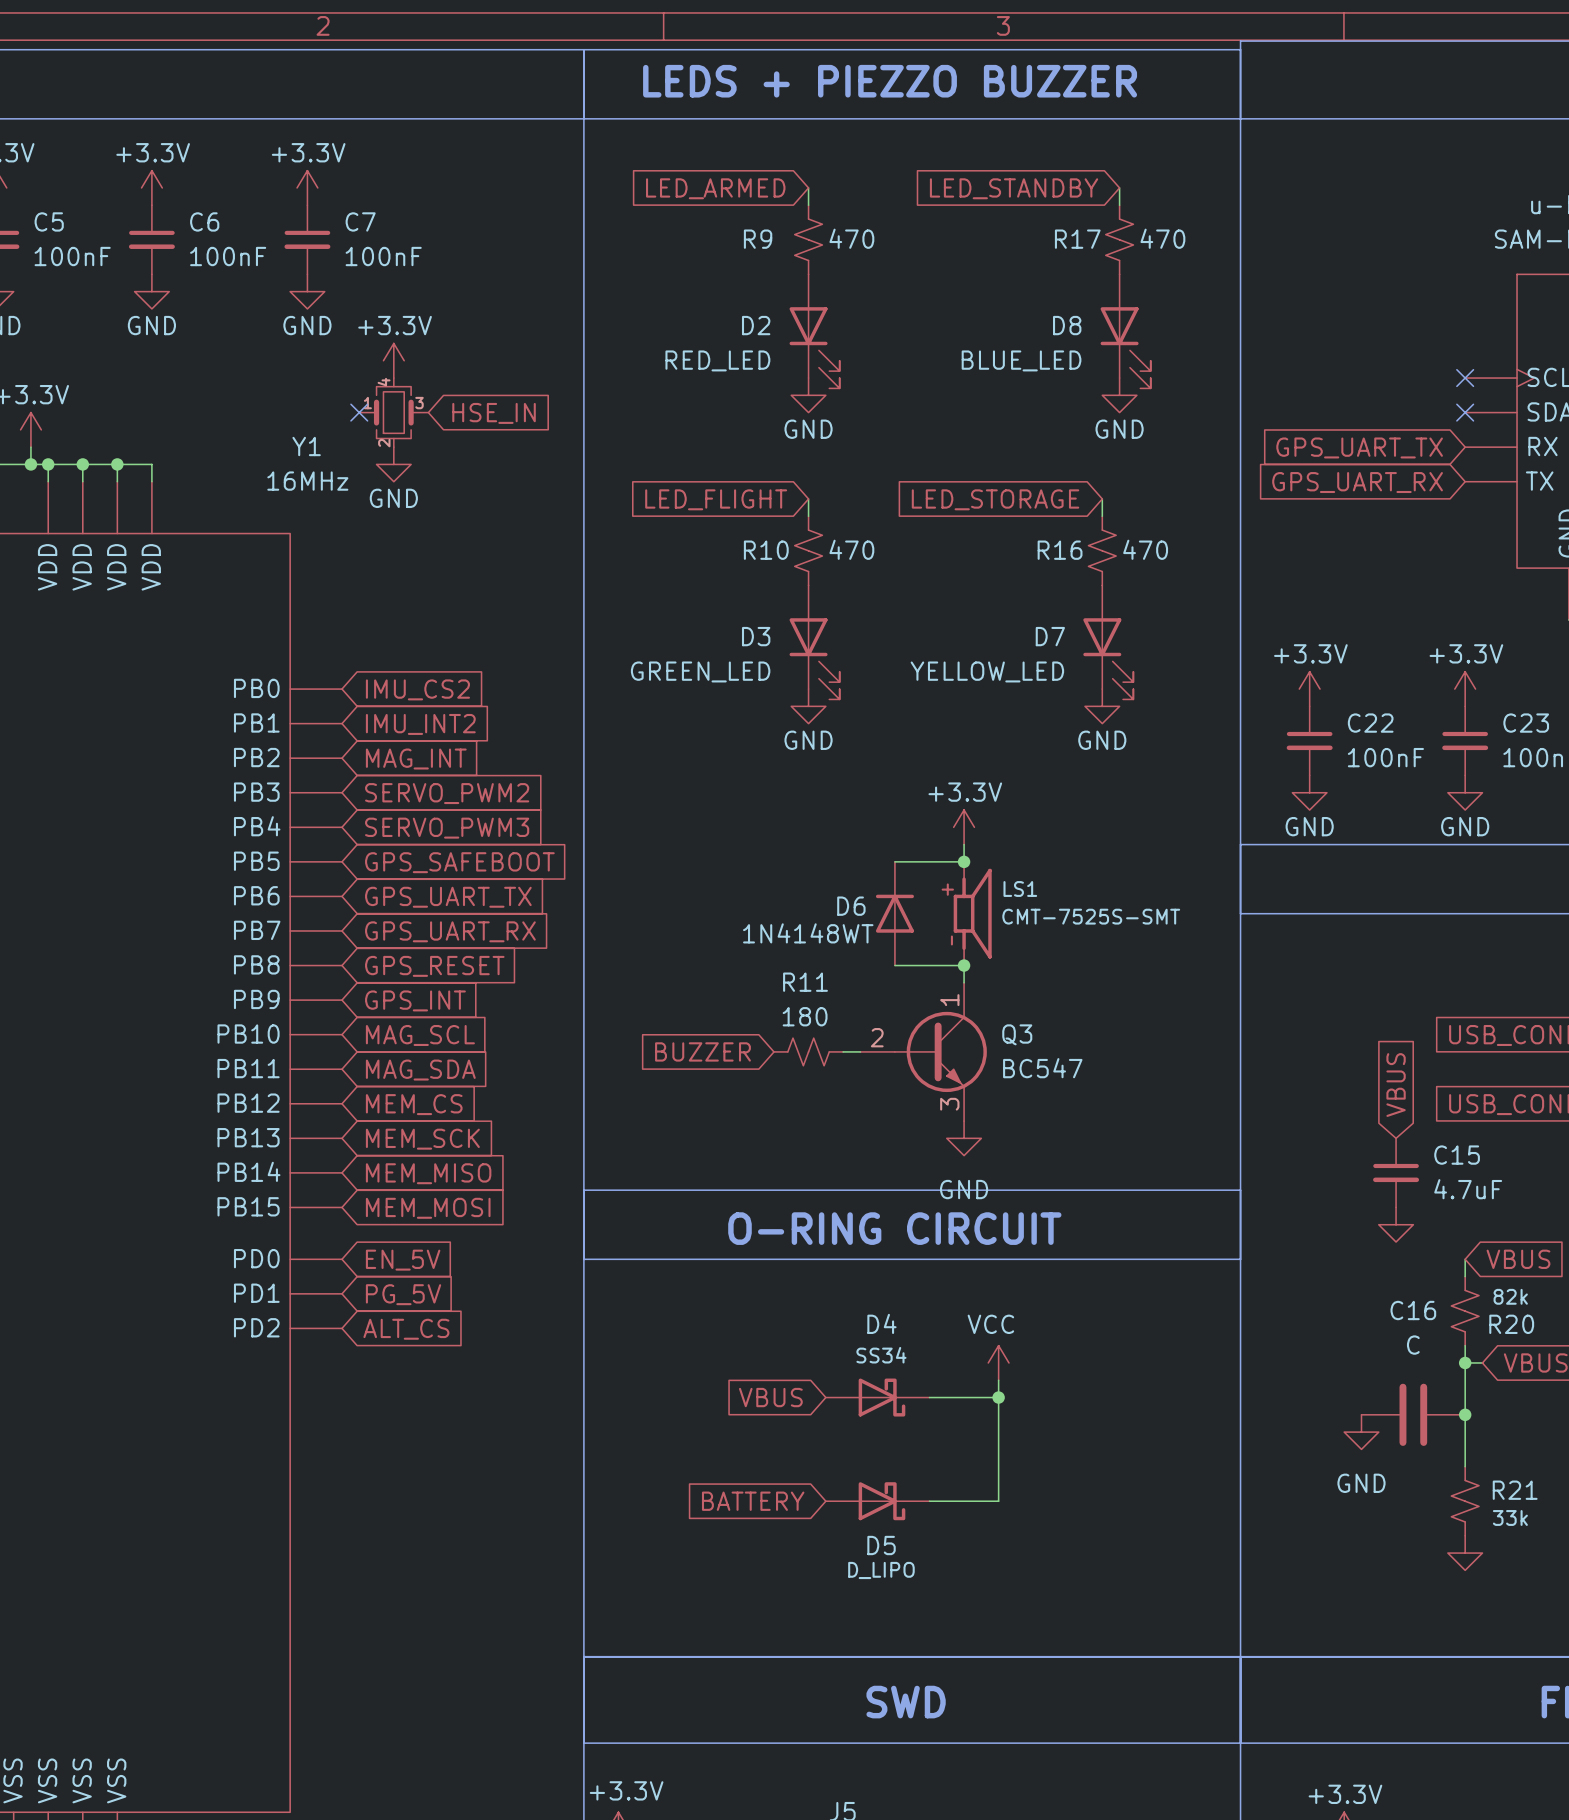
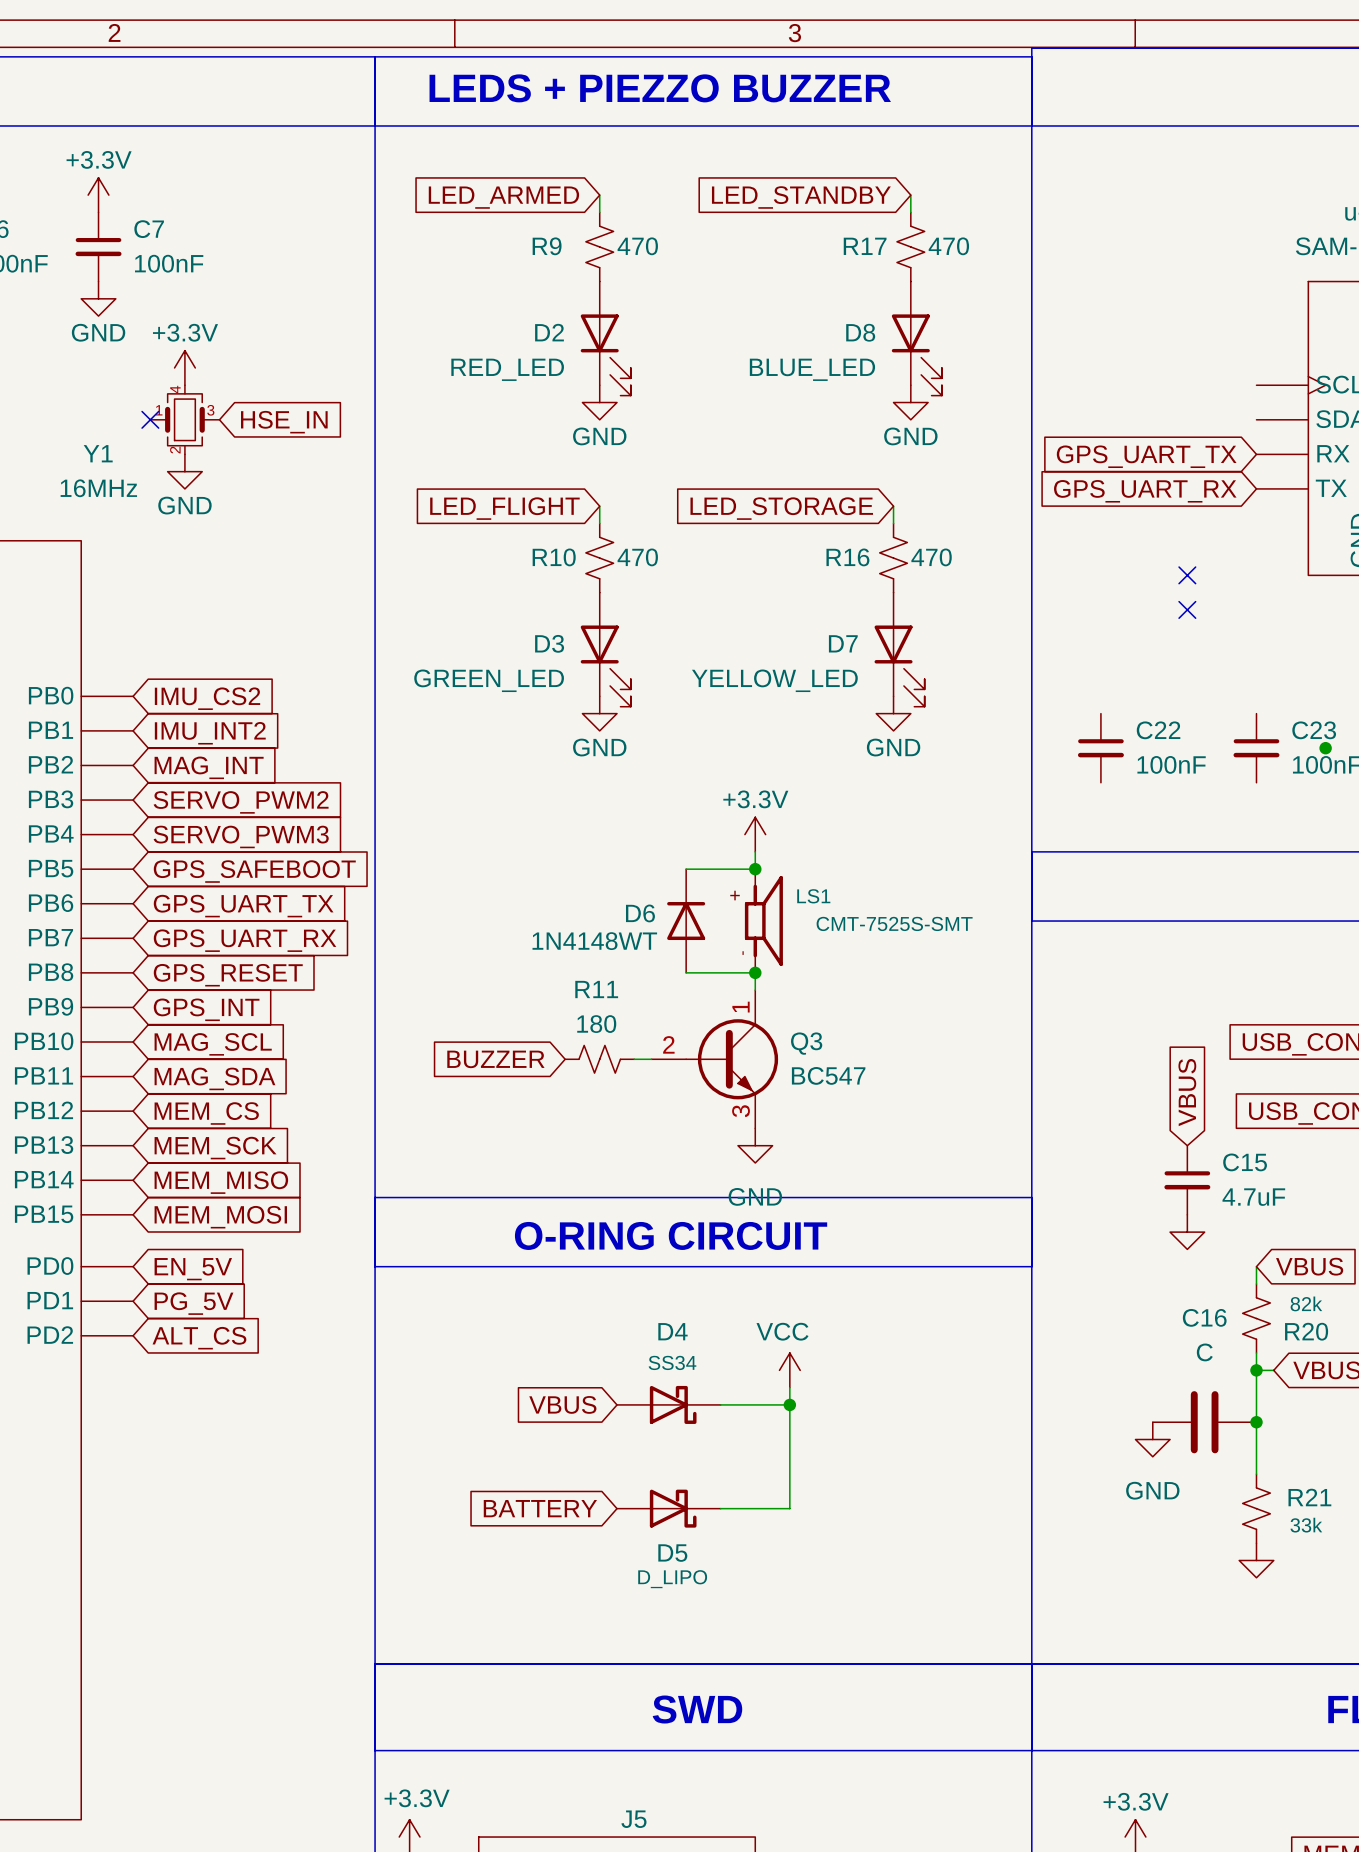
no-connect mark: (1465, 378) -> none
no-connect mark: (1465, 412) -> none
no-connect mark: none -> (1187, 575)
no-connect mark: none -> (1187, 609)
power symbol: +3.3V (1309, 689) -> none
power symbol: +3.3V (1465, 689) -> none
junction: none -> (1325, 748)
power symbol: GND (1309, 792) -> none
power symbol: GND (1465, 792) -> none

